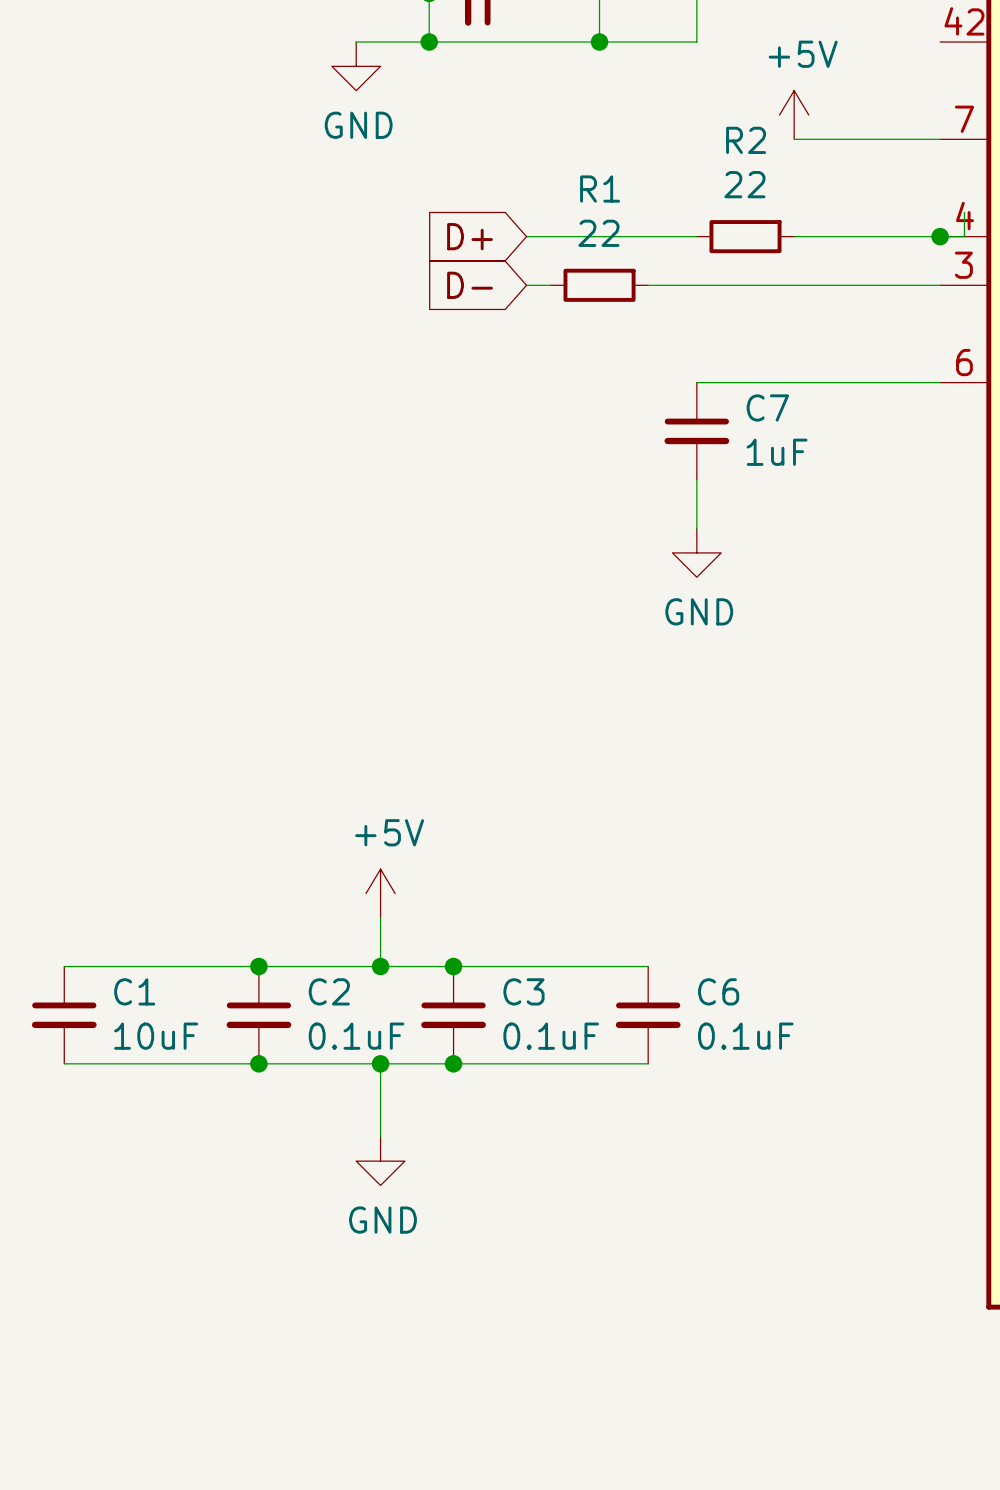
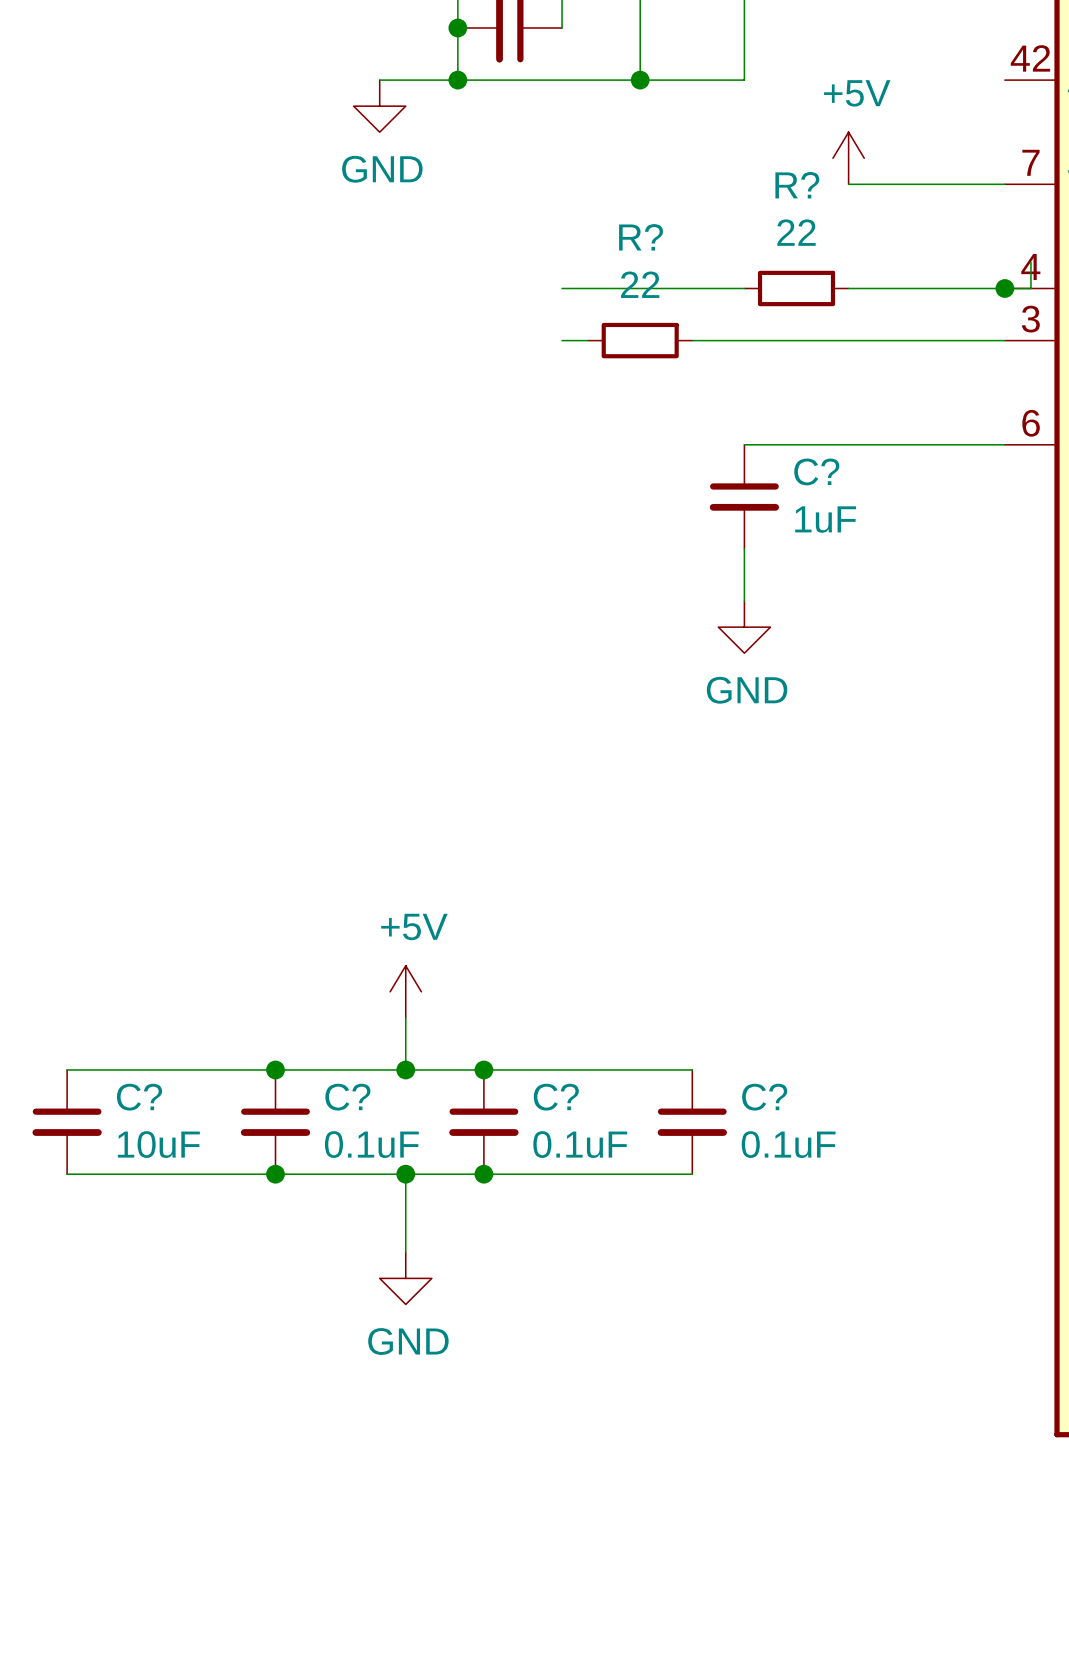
R2 name: R2 (746, 140) -> R? (797, 185)
R1 name: R1 (600, 189) -> R? (641, 237)
global label: D+ (470, 236) -> none
global label: D- (470, 285) -> none
C7 name: C7 (767, 407) -> C? (816, 471)
C1 name: C1 (134, 991) -> C? (139, 1097)
C2 name: C2 (329, 991) -> C? (347, 1097)
C3 name: C3 (523, 991) -> C? (556, 1097)
C6 name: C6 (718, 991) -> C? (764, 1097)

